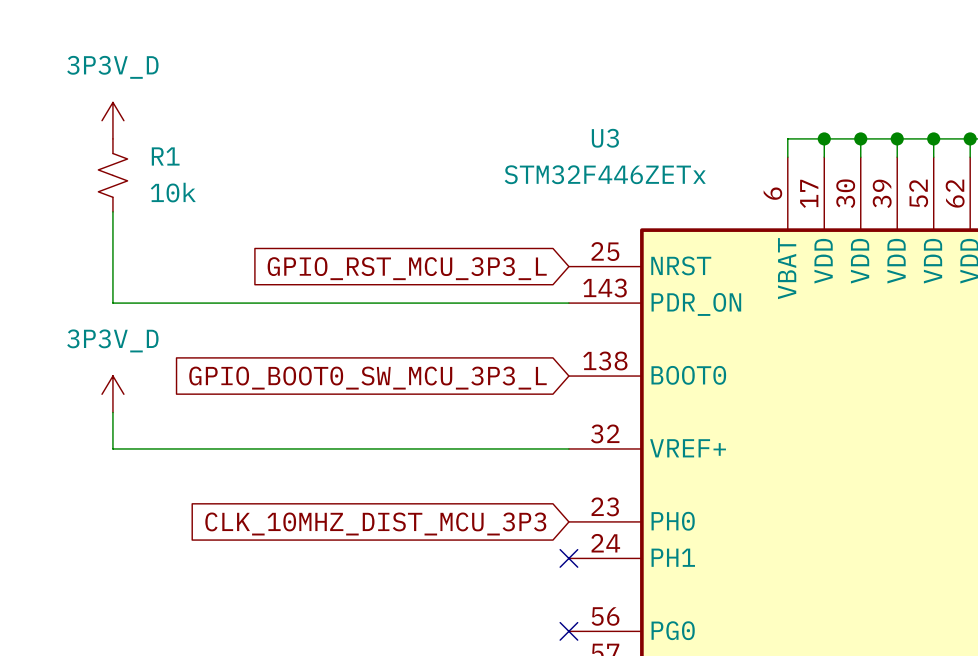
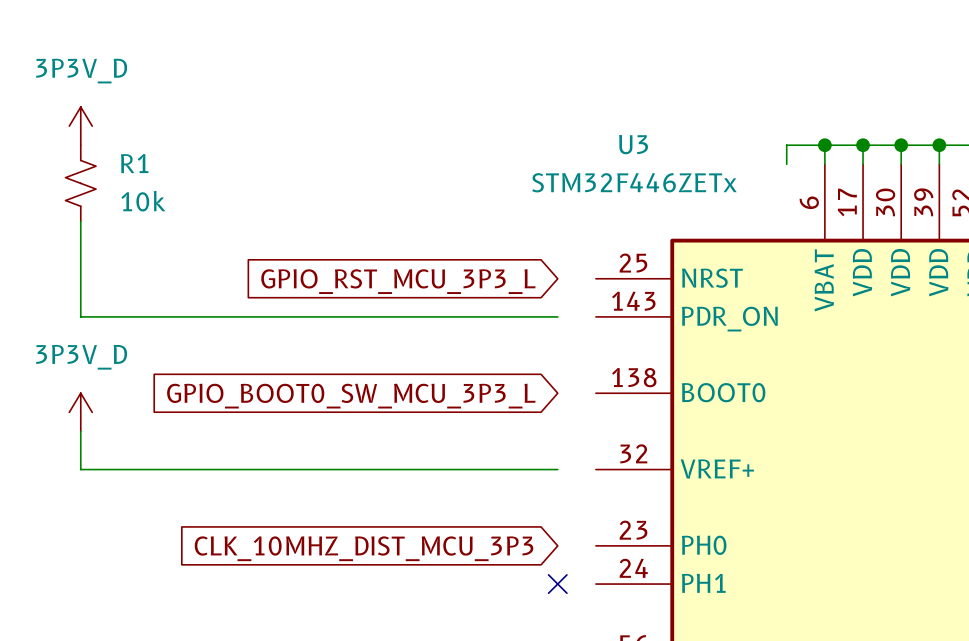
power symbol position: 3P3V_D (112, 120) -> 3P3V_D (80, 126)
wire: none -> (824, 145) (786, 145) (786, 164)
junction: none -> (824, 145)
R1 position: (112, 175) -> (80, 183)
wire: (112, 211) (112, 303) -> (80, 221) (80, 316) (118, 316)
global label position: GPIO_RST_MCU_3P3_L (407, 268) -> GPIO_RST_MCU_3P3_L (398, 281)
wire: (532, 303) (568, 303) -> none
global label position: GPIO_BOOT0_SW_MCU_3P3_L (367, 378) -> GPIO_BOOT0_SW_MCU_3P3_L (351, 396)
power symbol position: 3P3V_D (112, 394) -> 3P3V_D (80, 412)
wire: (112, 412) (112, 448) -> (80, 431) (80, 469) (118, 469)
wire: (532, 448) (568, 448) -> none
global label position: CLK_10MHZ_DIST_MCU_3P3 (375, 523) -> CLK_10MHZ_DIST_MCU_3P3 (364, 548)
no-connect mark position: (568, 558) -> (557, 584)

